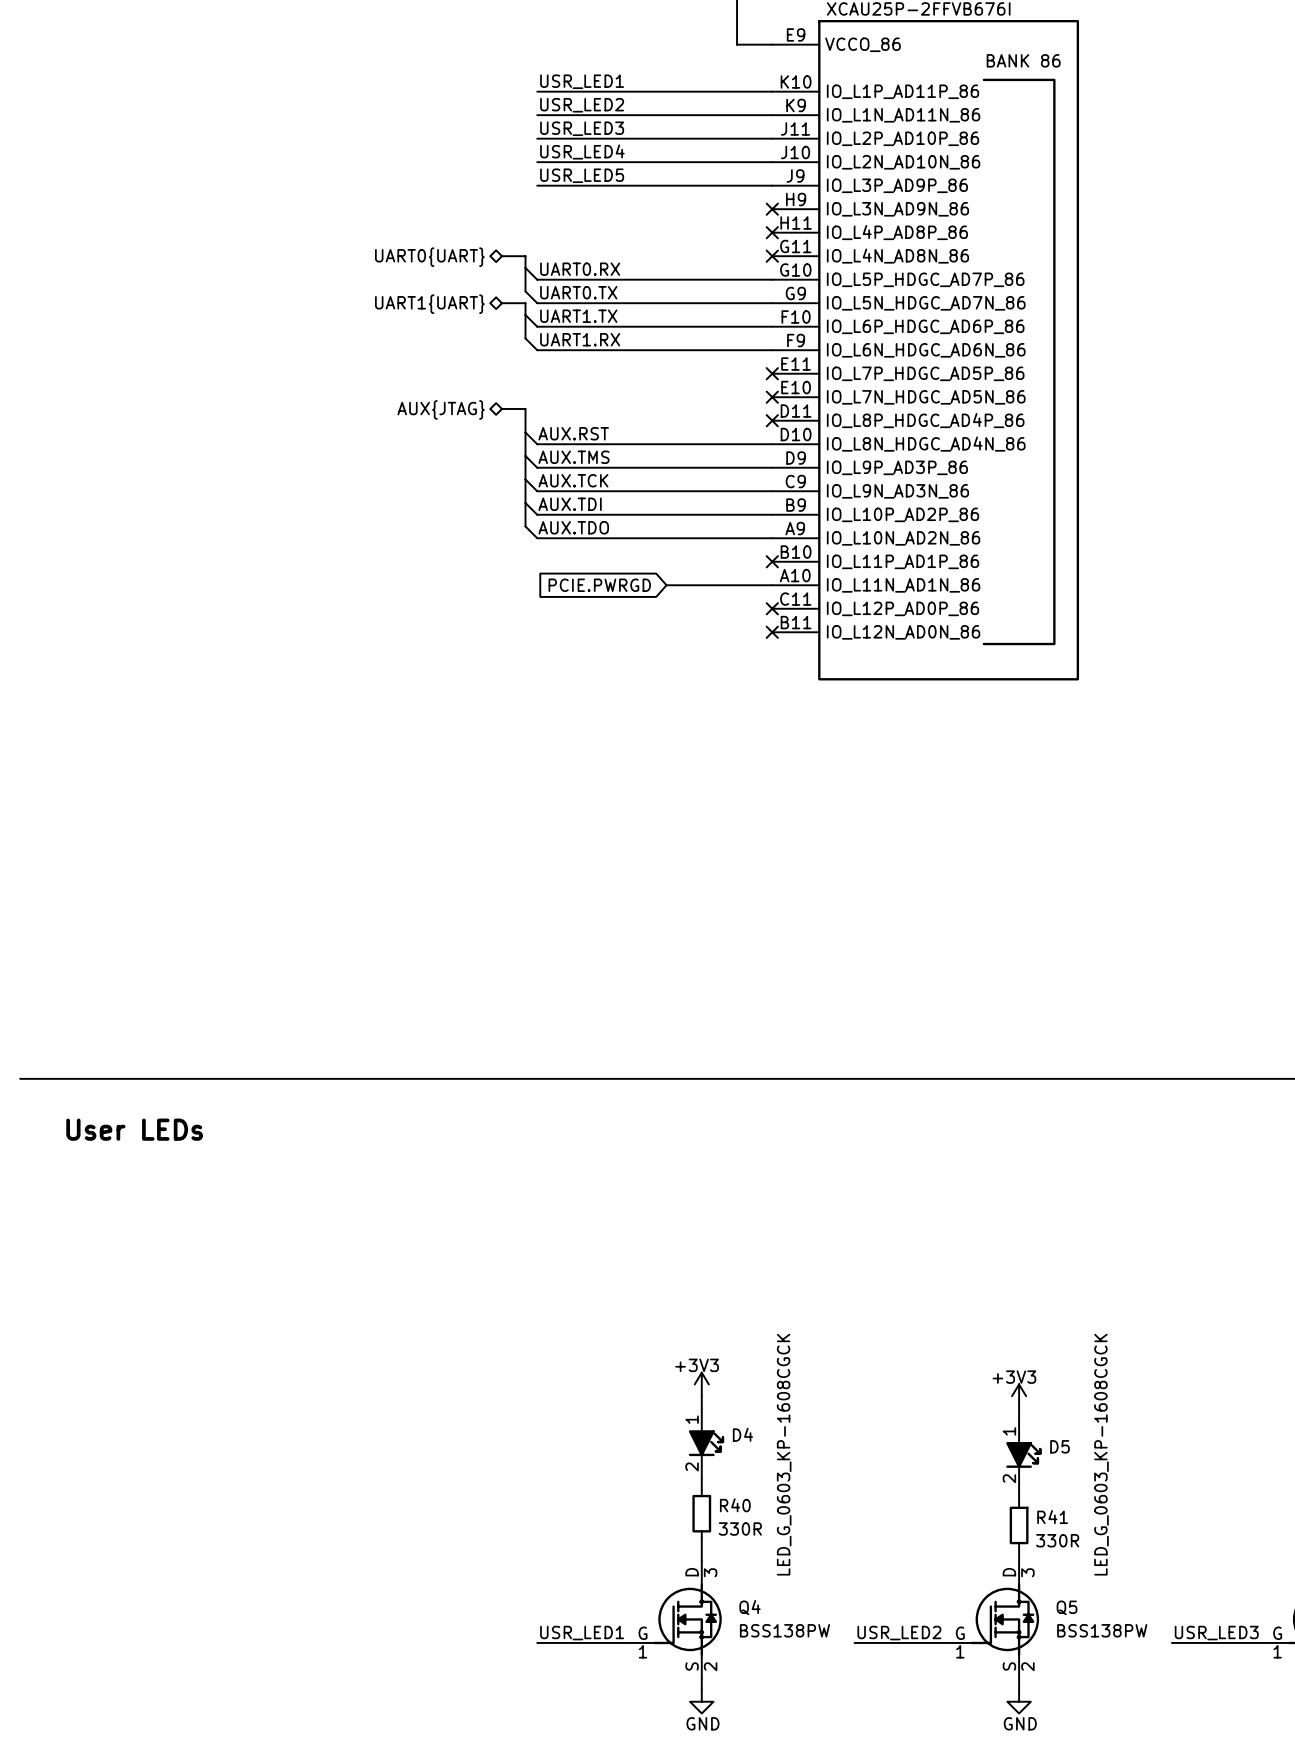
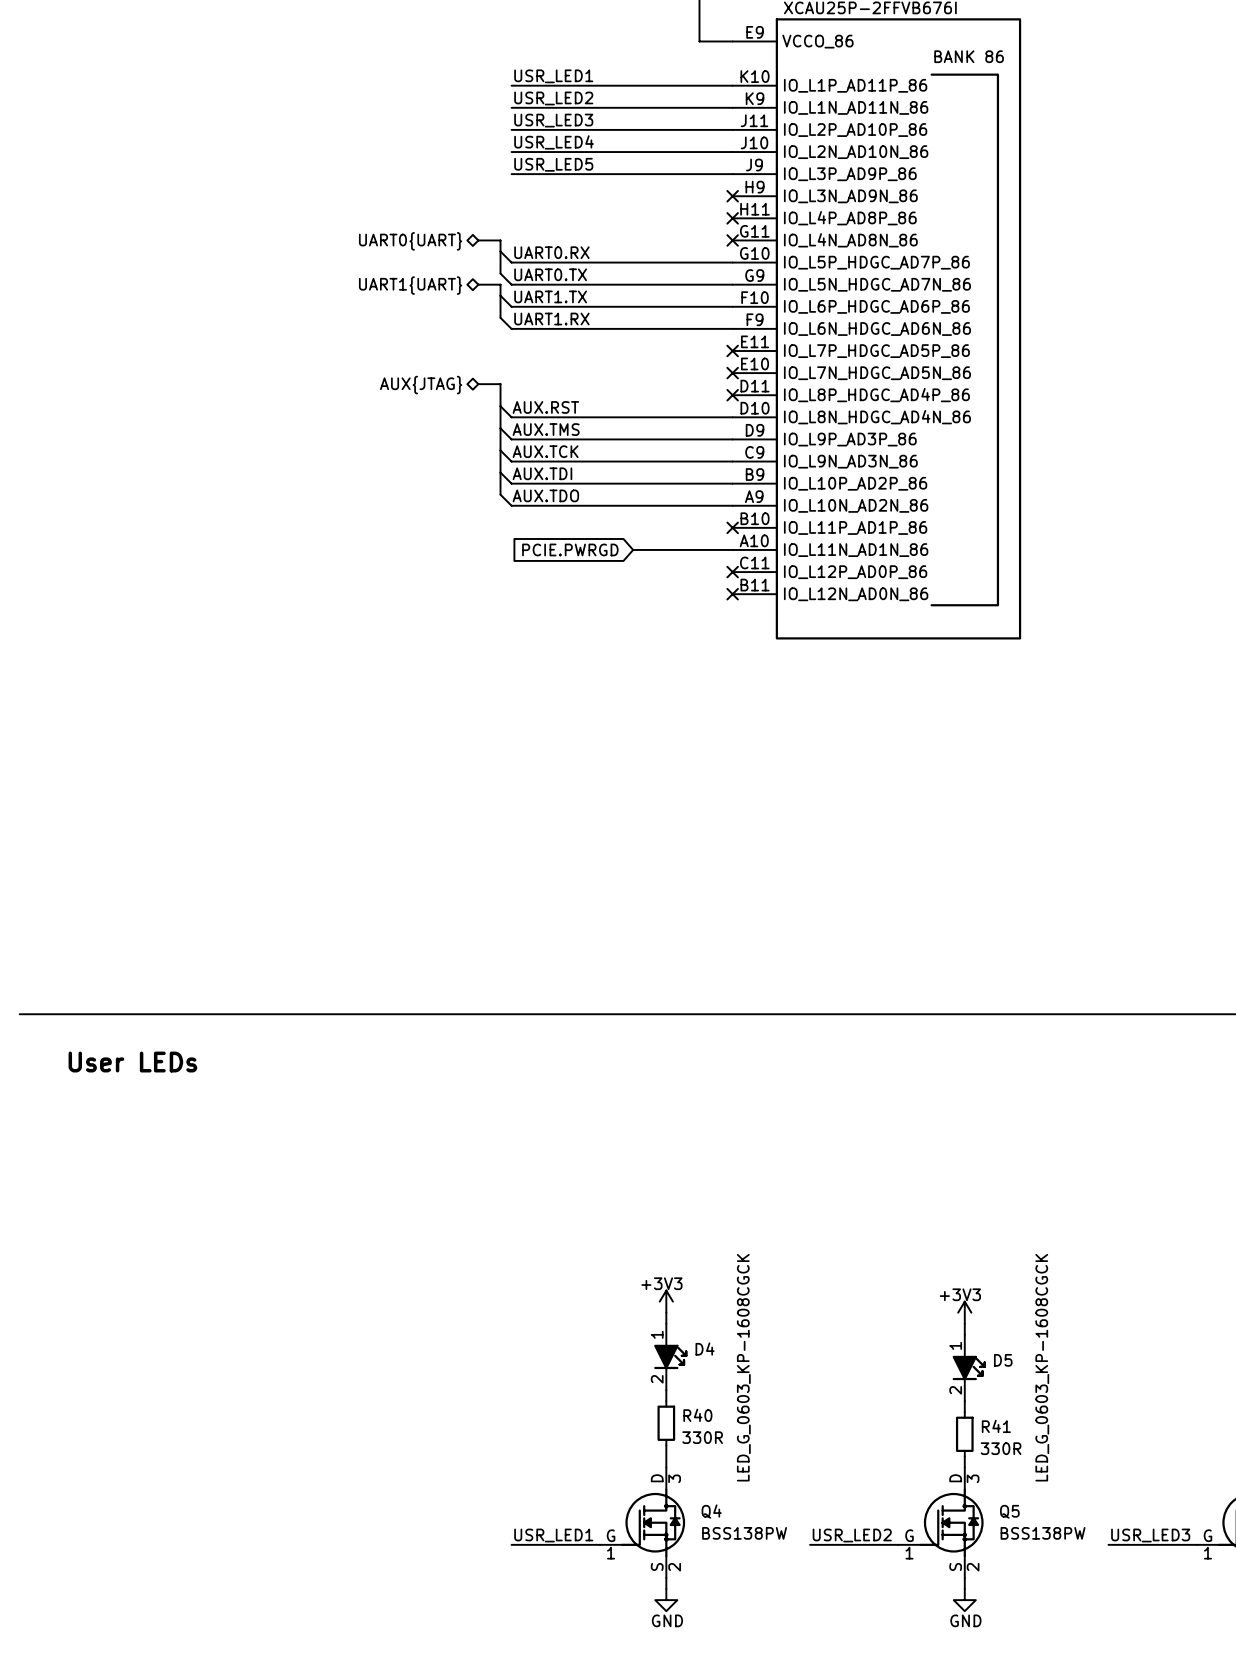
line: none -> (19, 1014) (25, 1014)

